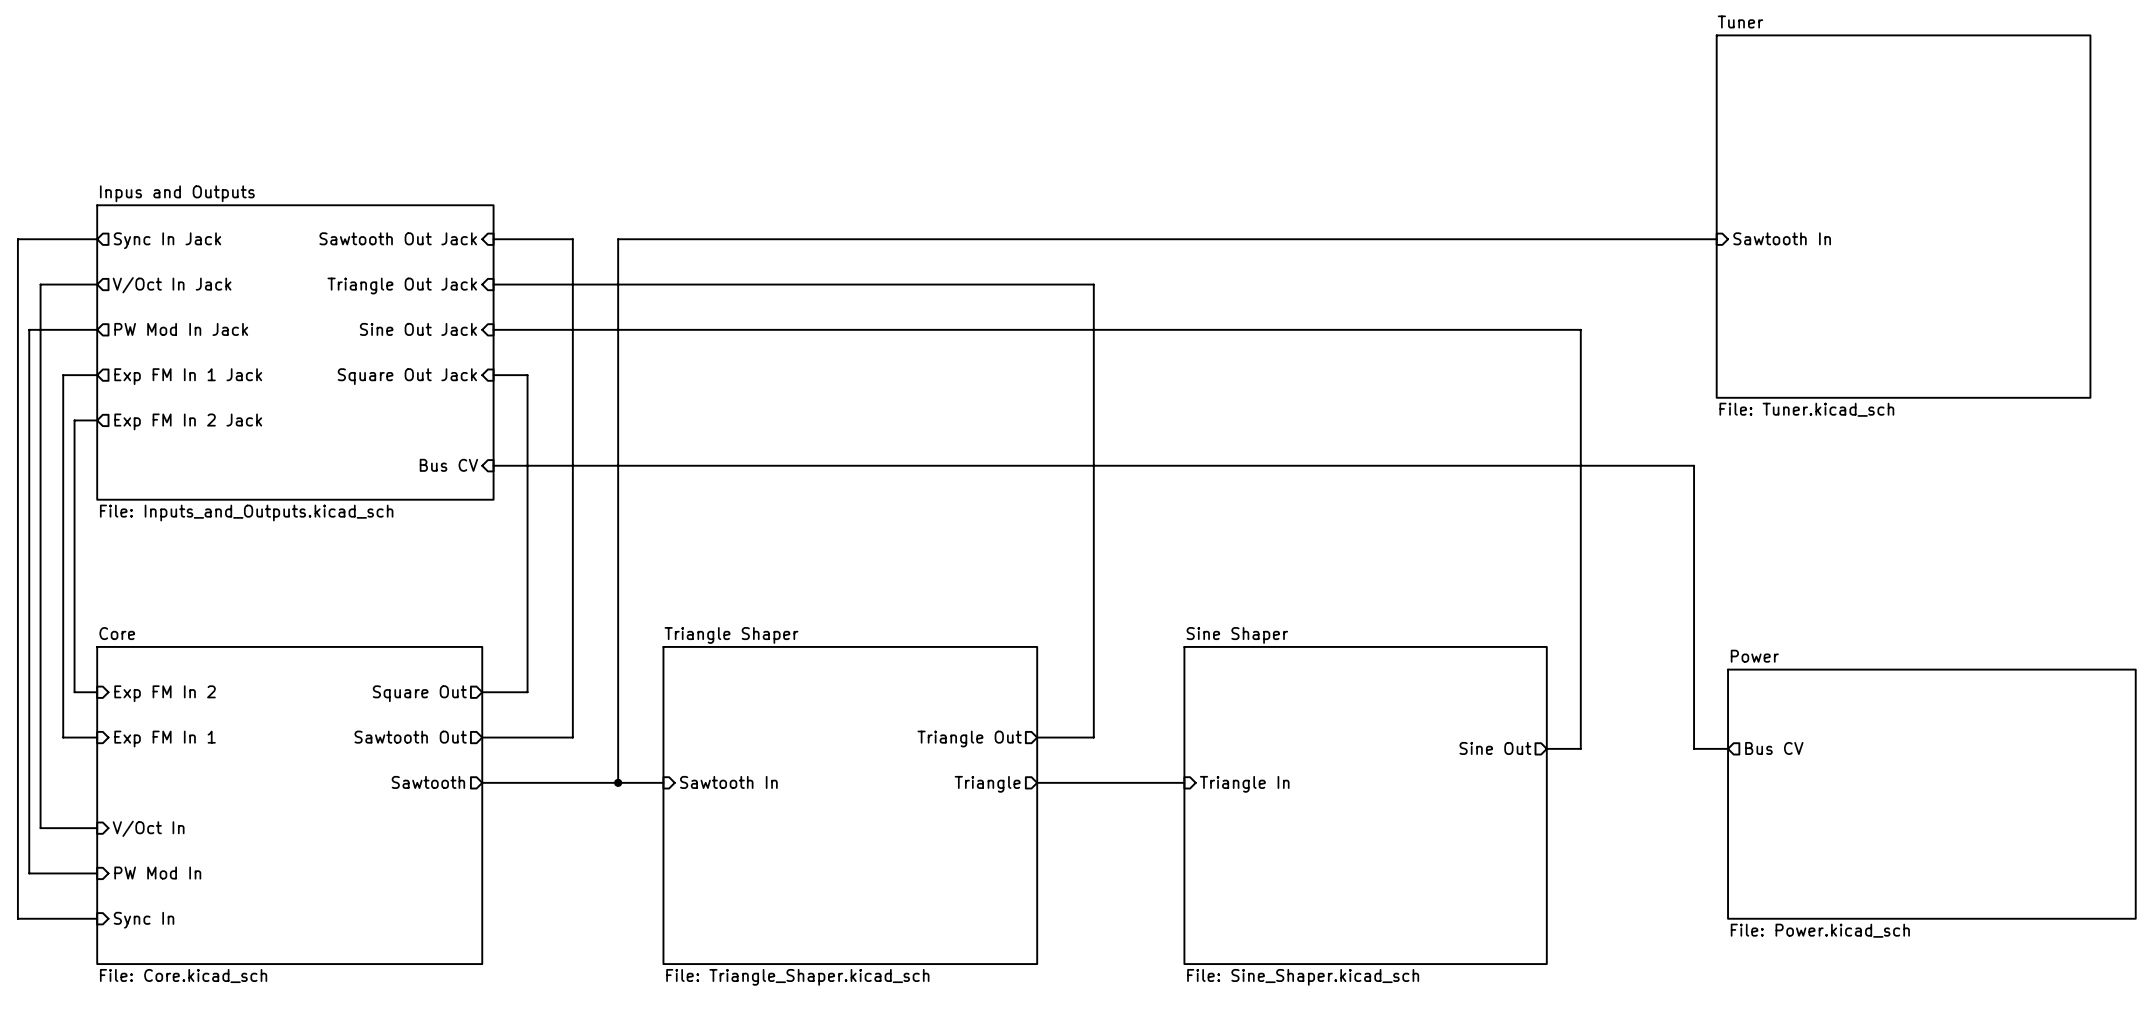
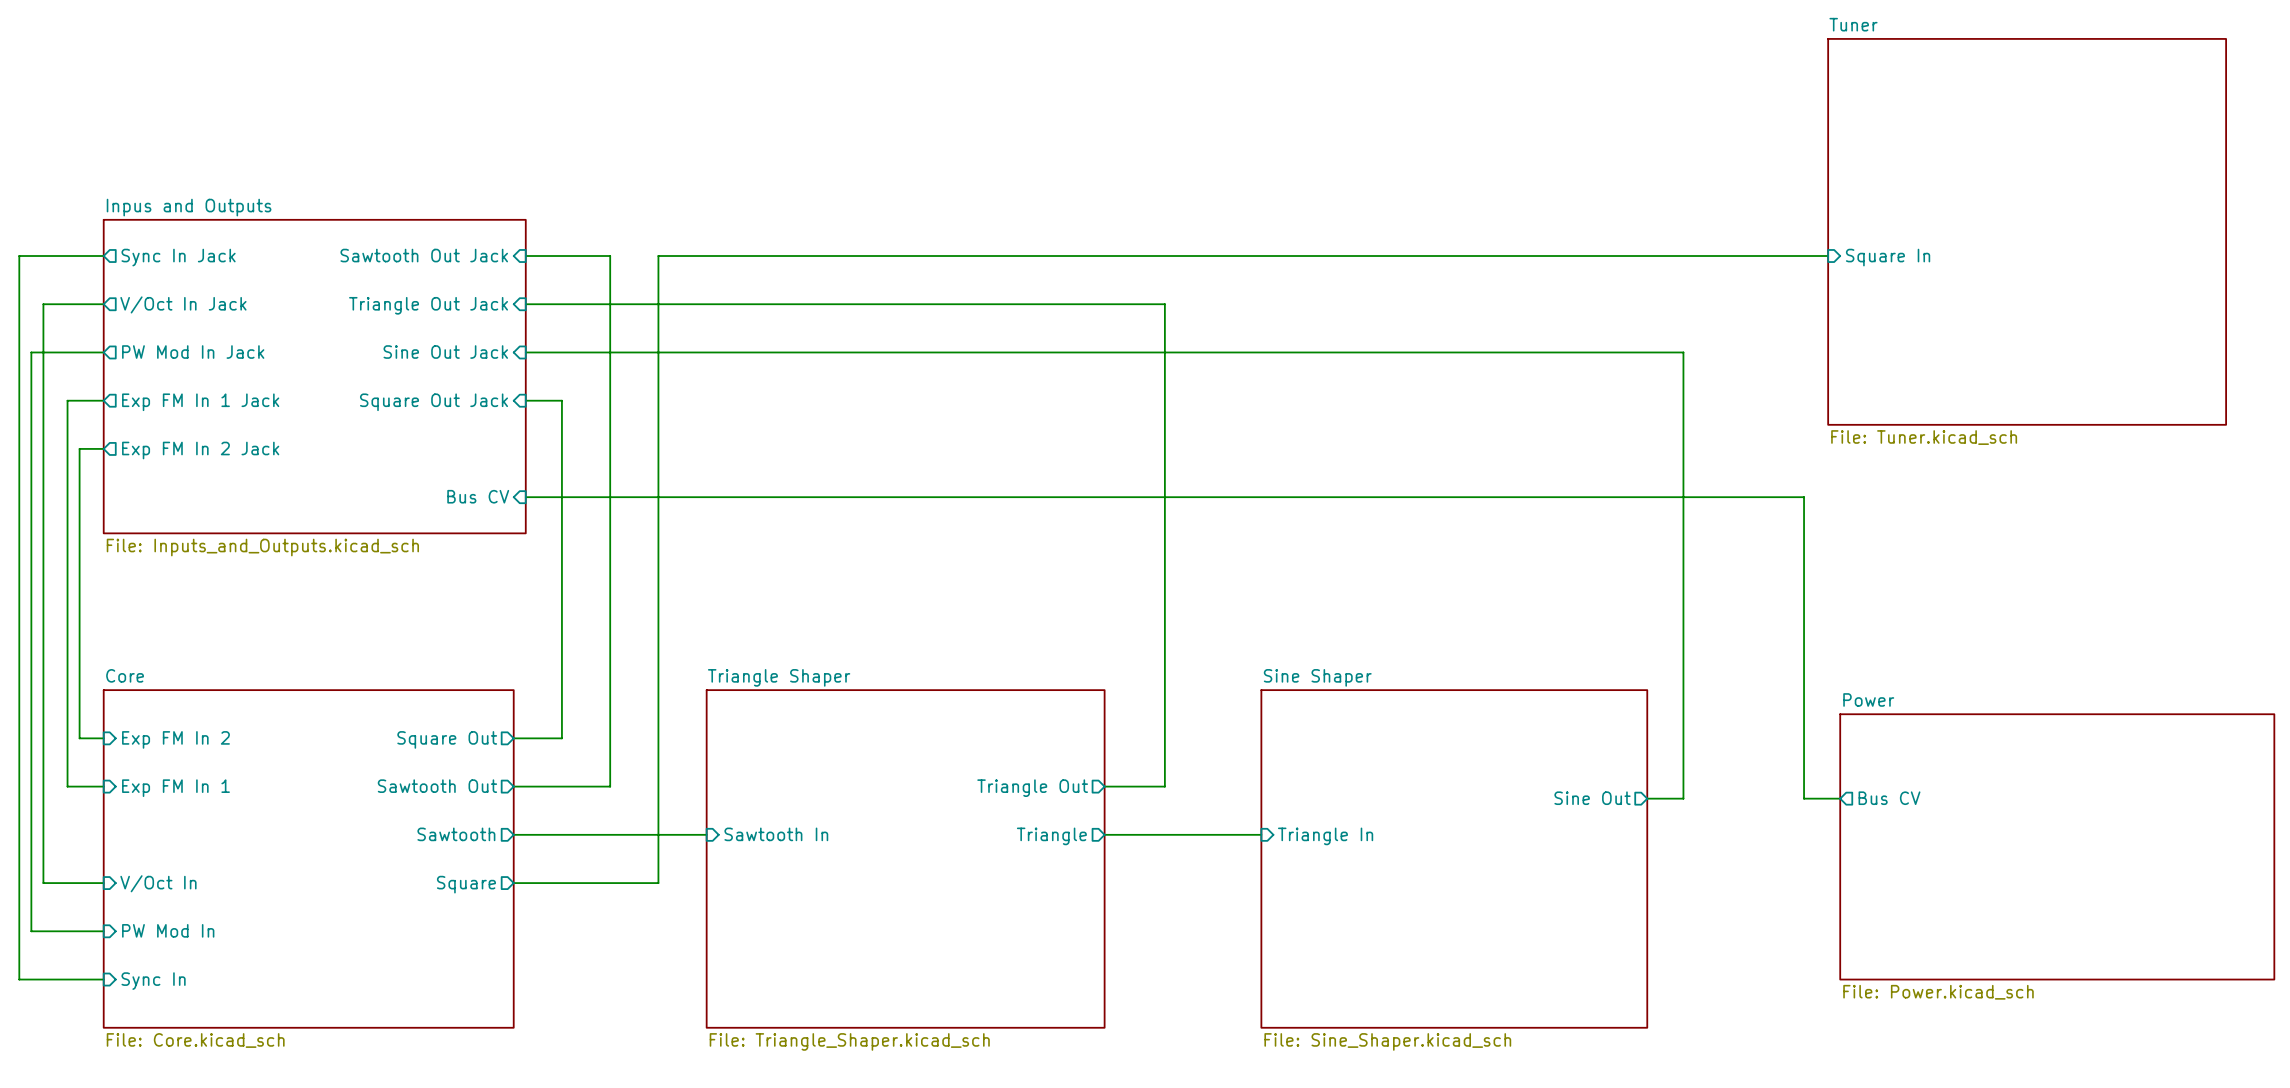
sheet pin: Sawtooth In (1782, 238) -> Square In (1888, 257)
wire: none -> (658, 834) (658, 883) (513, 883)
junction: (618, 782) -> none
sheet pin: none -> Square (466, 884)

